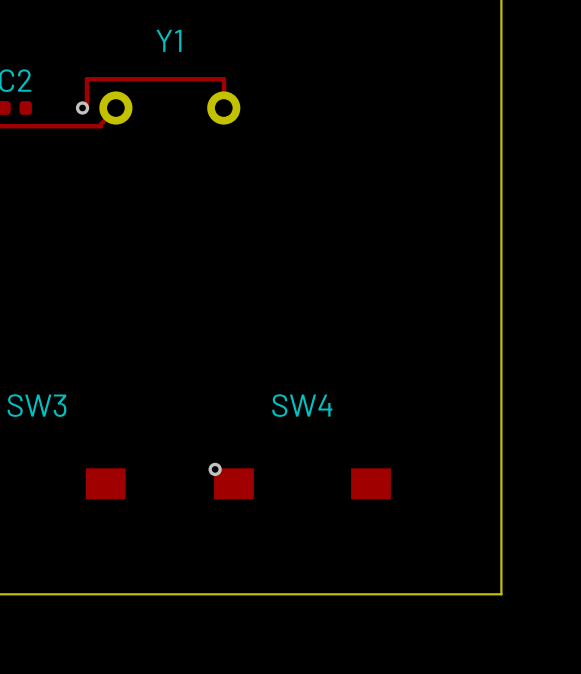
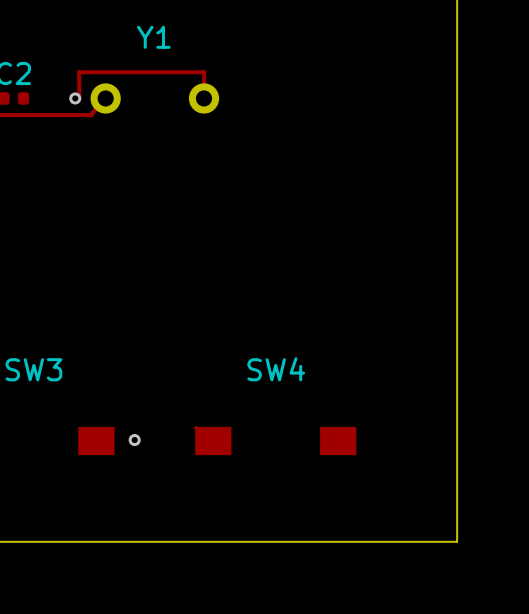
via position: (215, 469) -> (134, 440)

